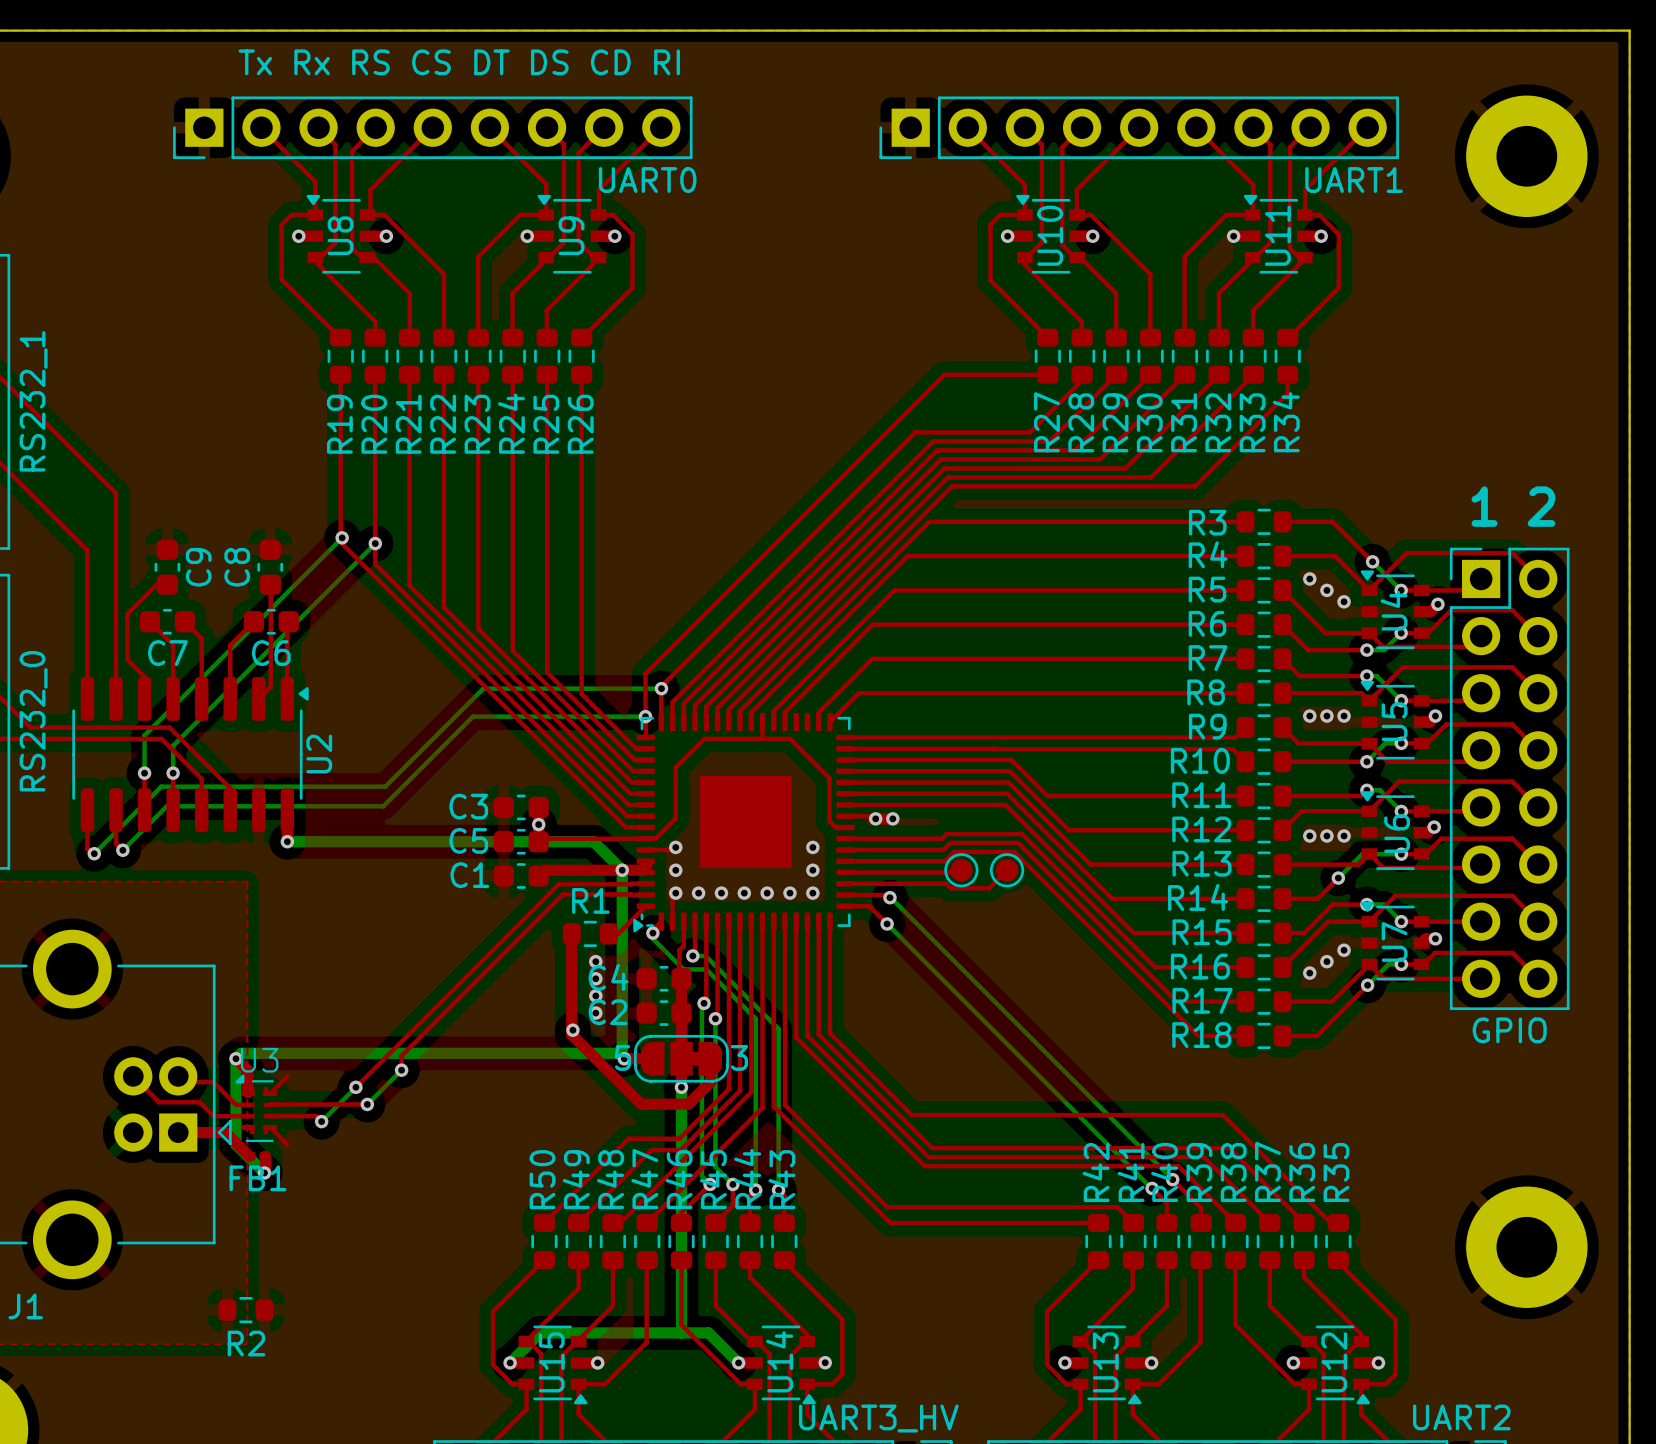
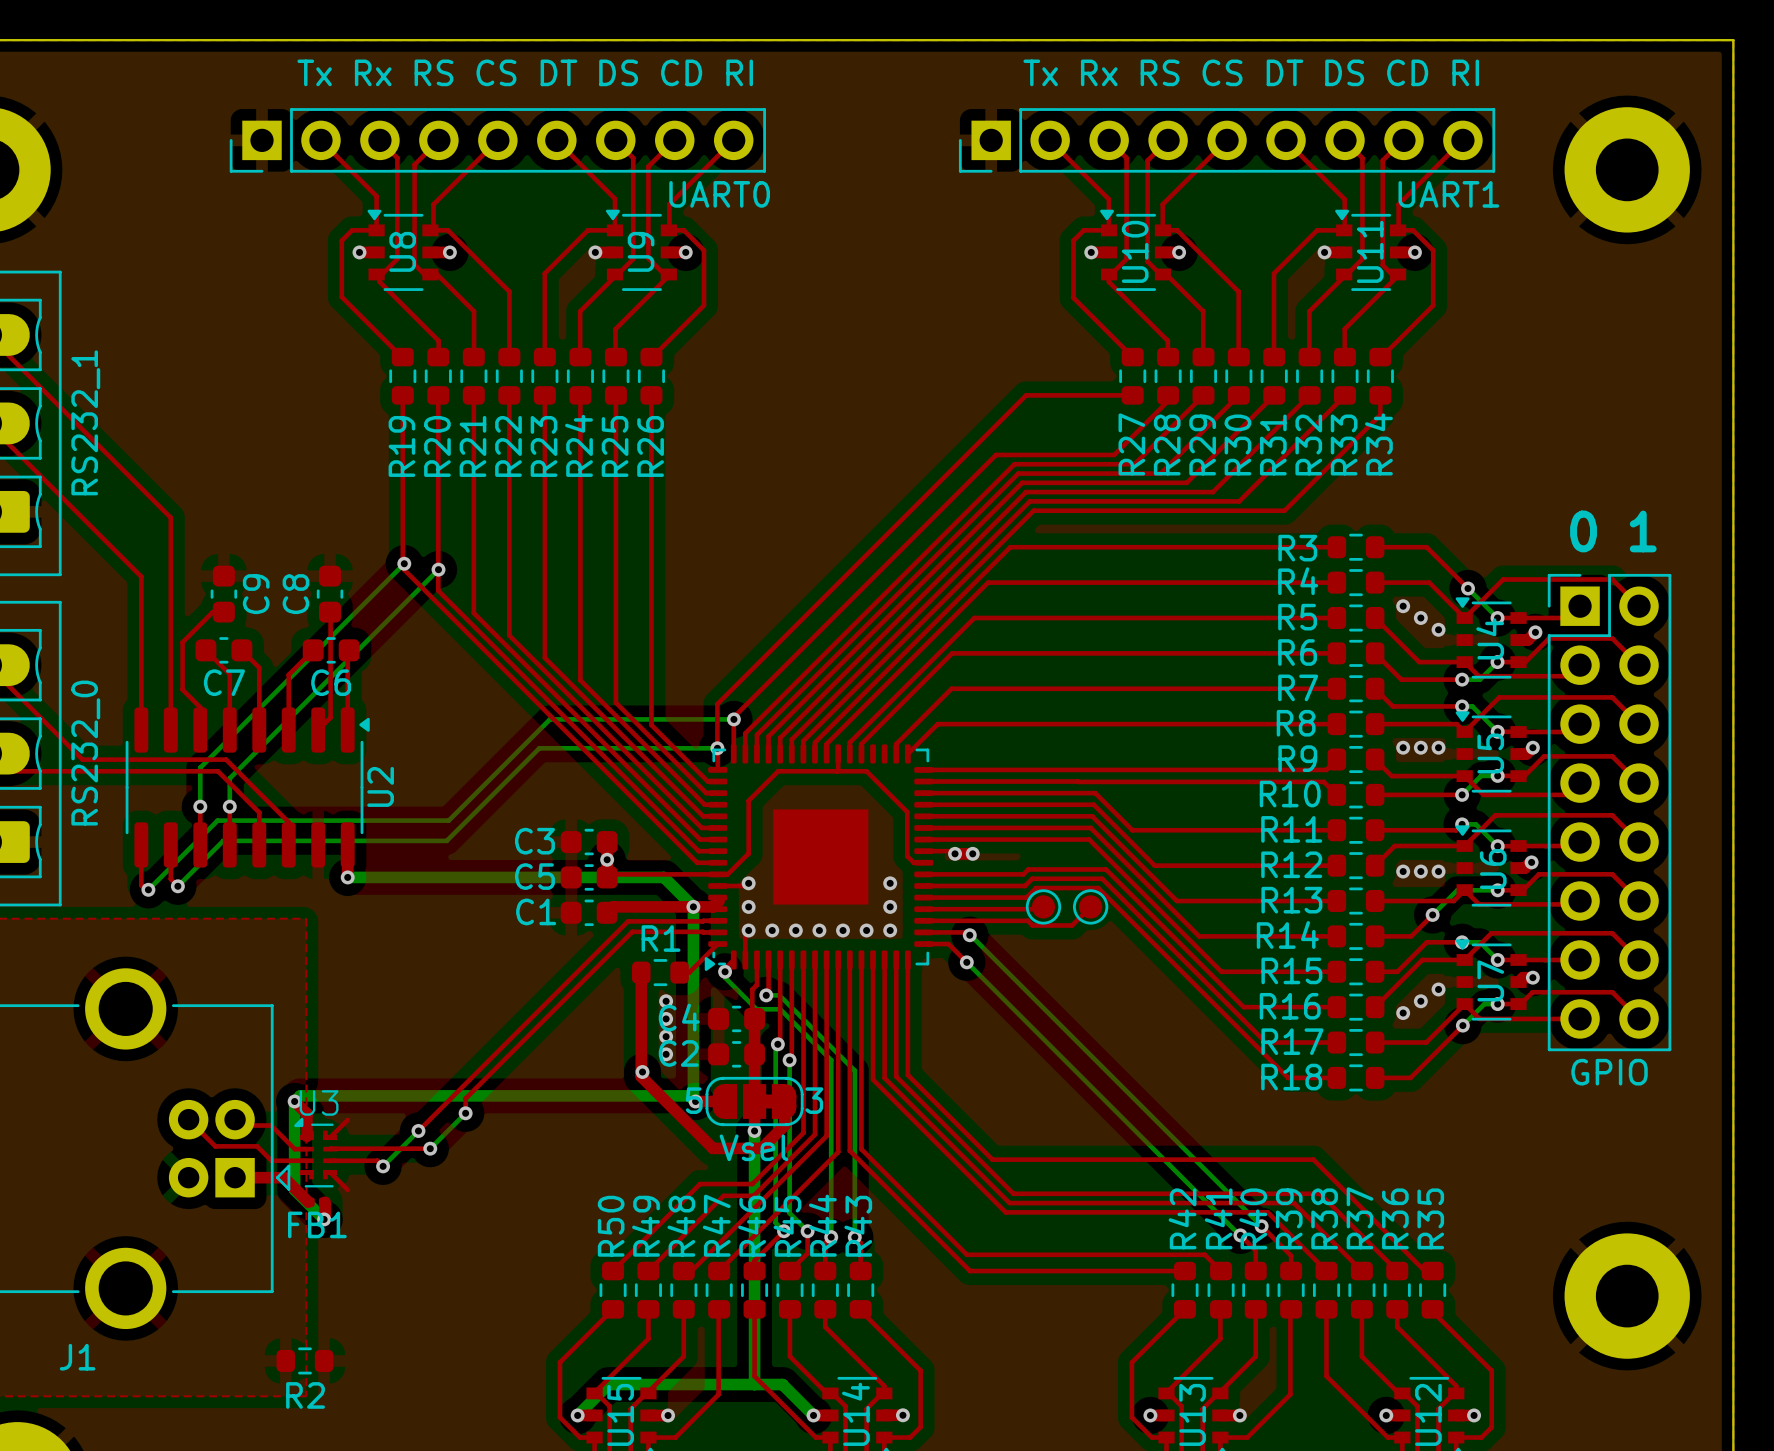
text: none -> Tx Rx RS CS DT DS CD RI (1251, 72)
text: 1 2 (1513, 506) -> 0 1 (1613, 531)
part value: none -> Vsel (754, 1147)

